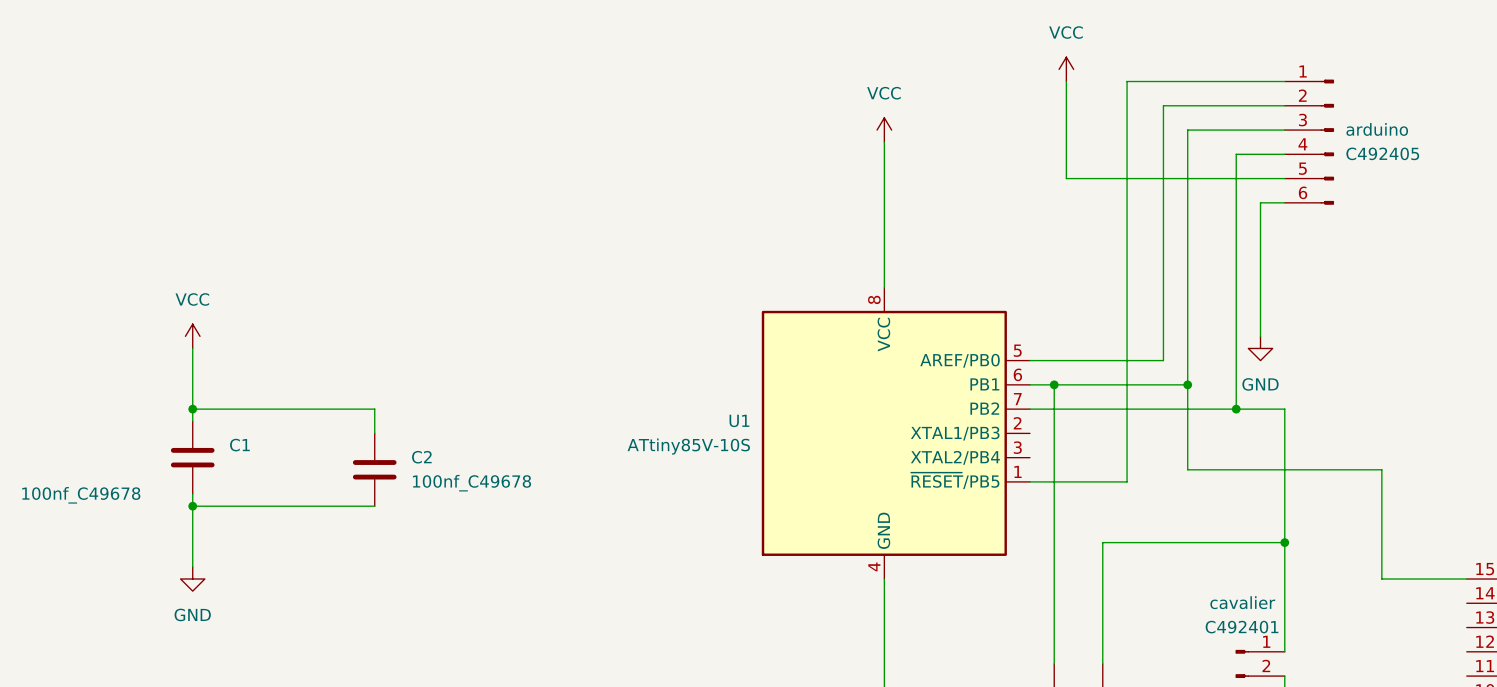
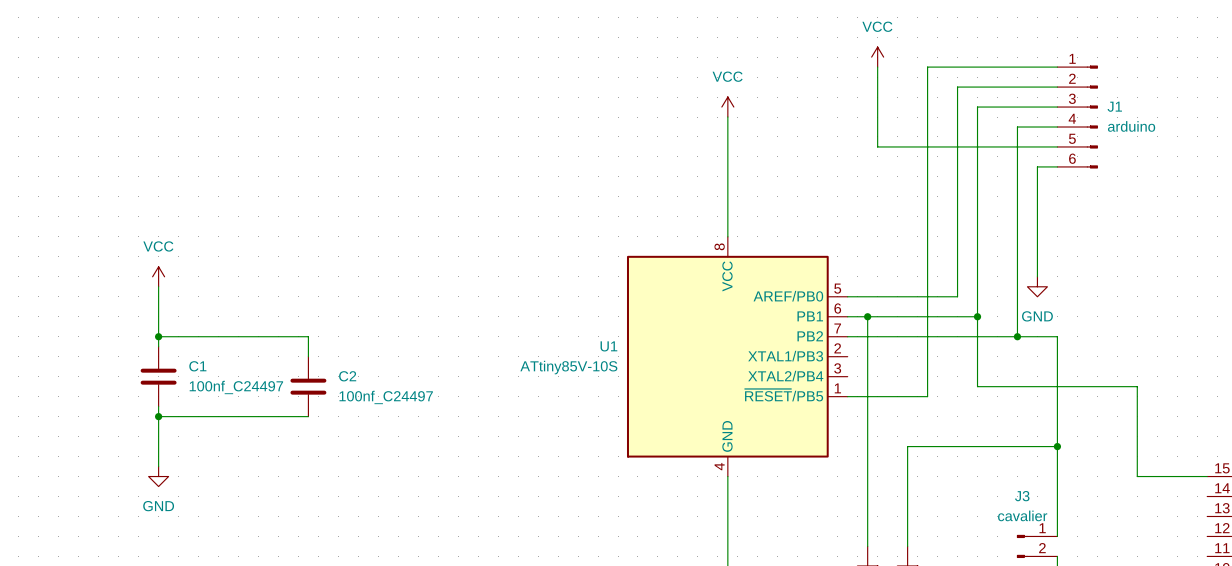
arduino name: arduino (1377, 129) -> J1 (1114, 106)
arduino value: C492405 (1382, 153) -> arduino (1131, 126)
C2 value: 100nf_C49678 (472, 483) -> 100nf_C24497 (386, 397)
C1 value: 100nf_C49678 (81, 495) -> 100nf_C24497 (236, 387)
cavalier name: cavalier (1242, 602) -> J3 (1022, 496)
cavalier value: C492401 (1242, 627) -> cavalier (1022, 515)

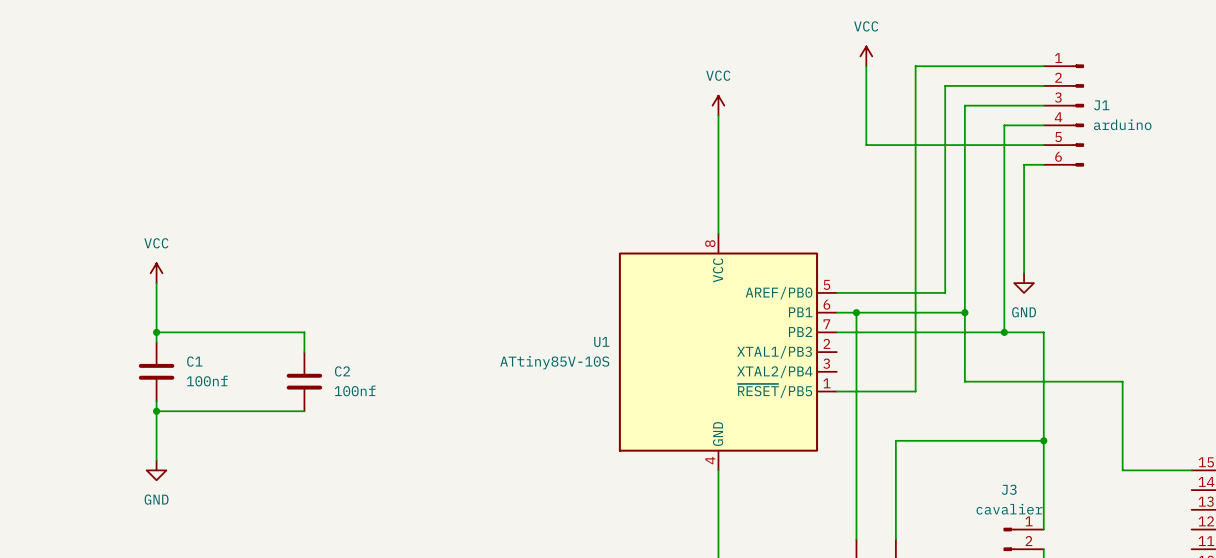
C1 value: 100nf_C24497 (236, 387) -> 100nf (207, 381)
C2 value: 100nf_C24497 (386, 397) -> 100nf (355, 390)

